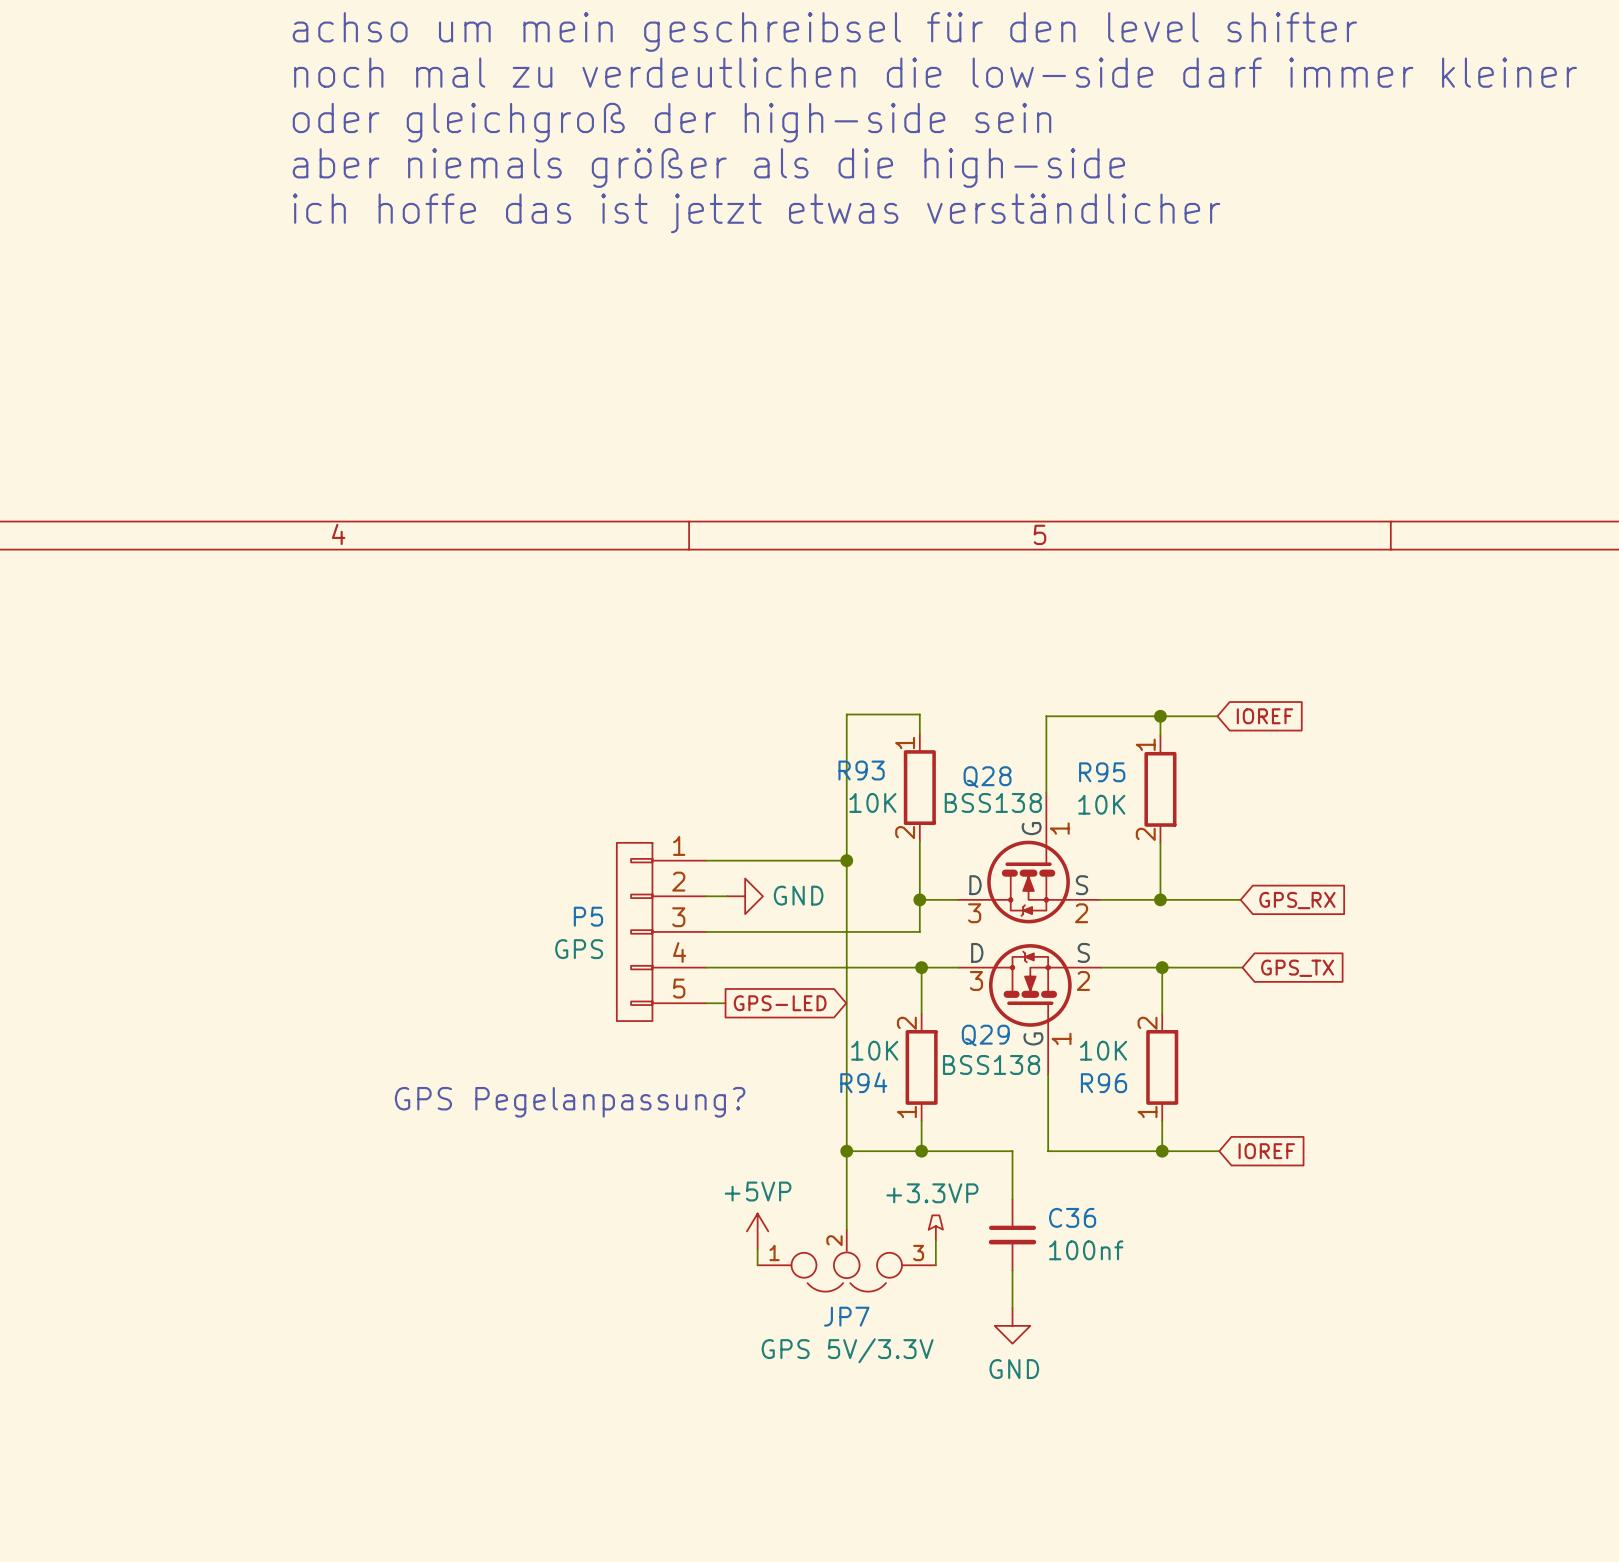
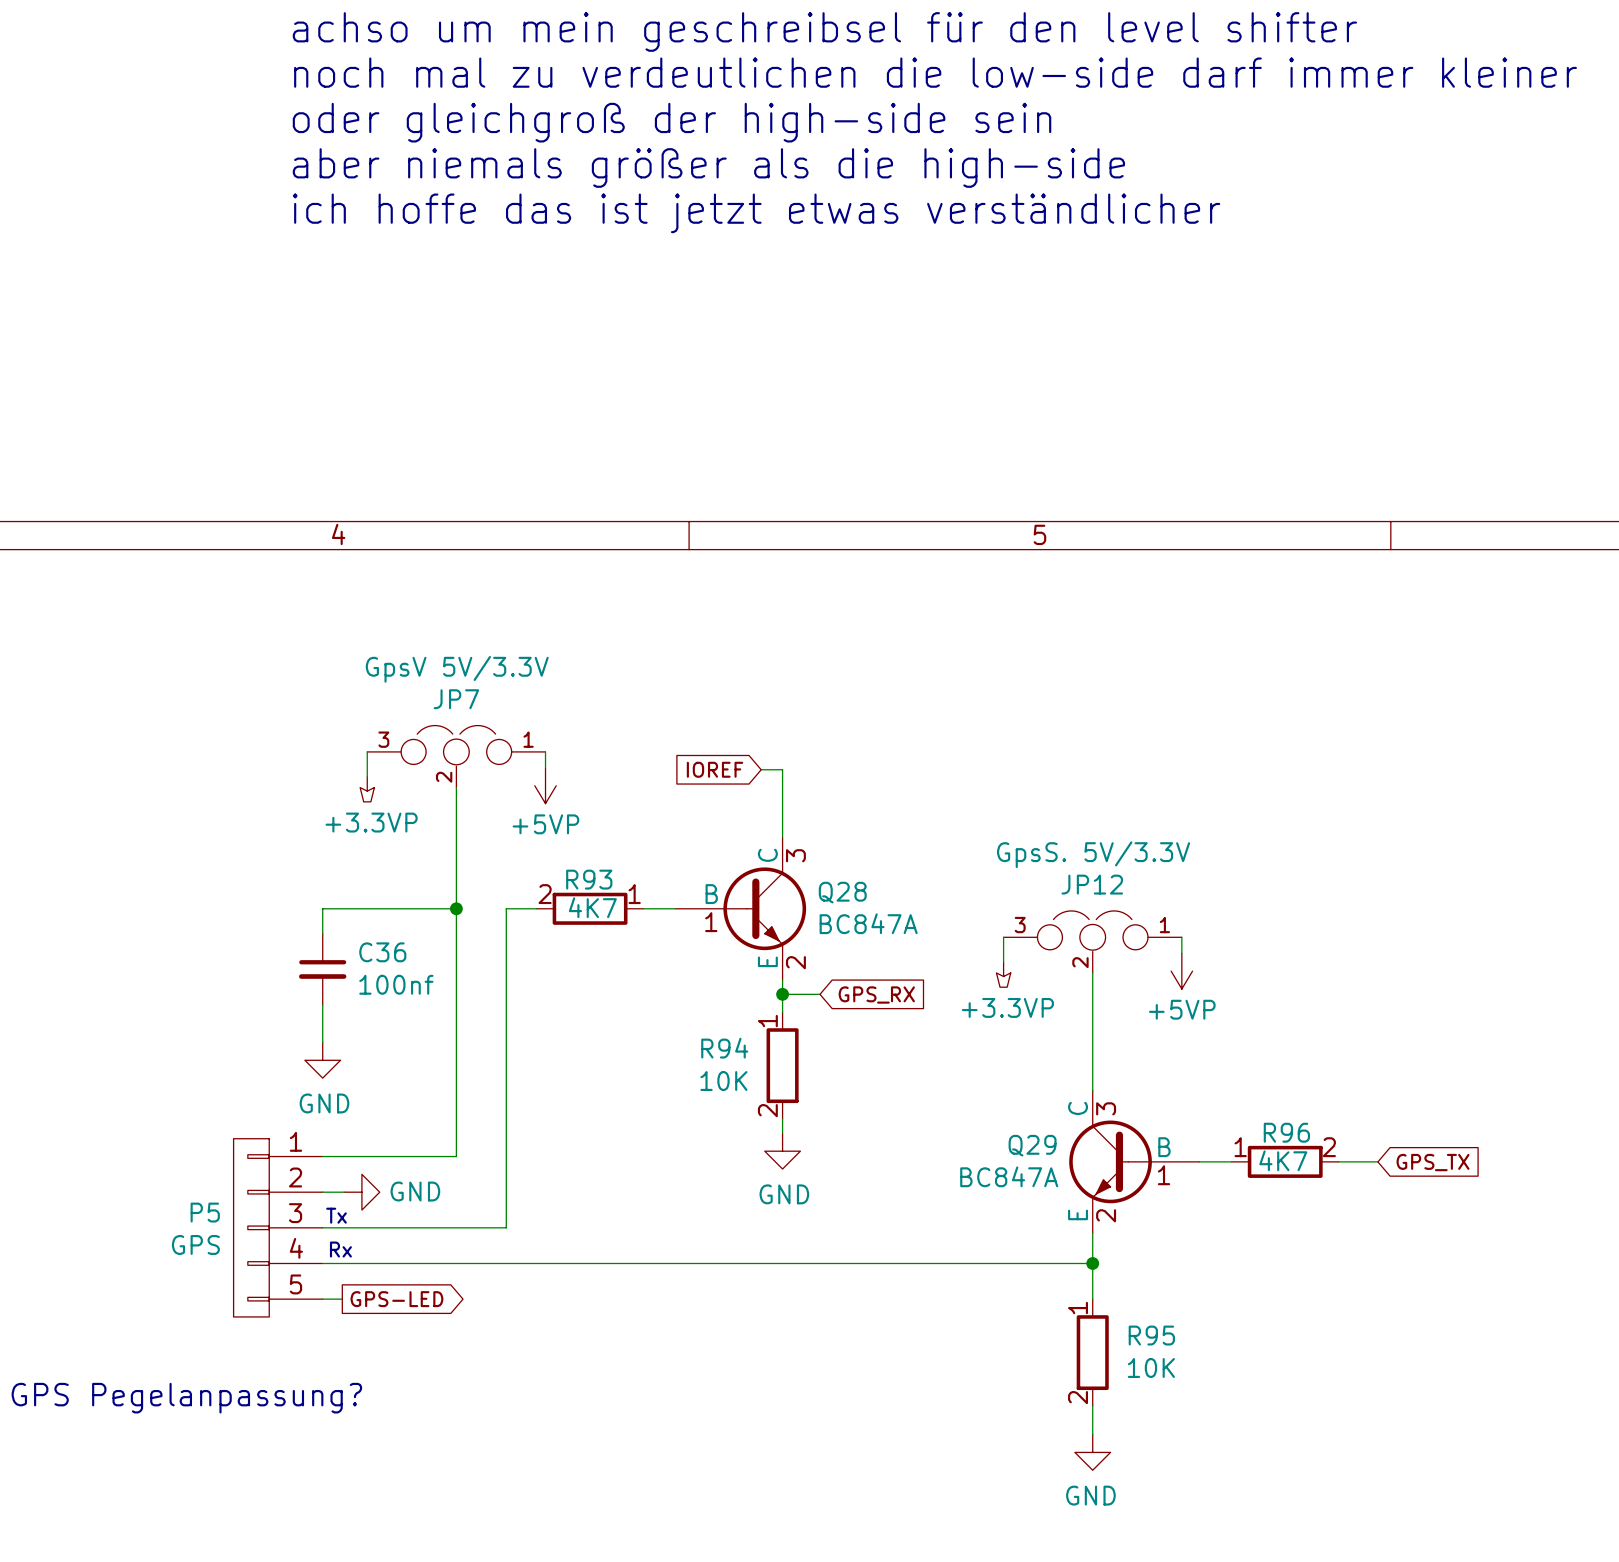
wire: (1160, 716) (1160, 735) -> none
junction: (1160, 716) -> none
wire: (1217, 716) (1046, 716) (1046, 792) -> none
global label: IOREF (1264, 716) -> none
wire: (919, 734) (919, 714) (846, 714) (846, 1229) -> none
wire: none -> (367, 751) (367, 776)
wire: none -> (545, 751) (545, 767)
global label: none -> IOREF (715, 769)
wire: none -> (761, 769) (782, 769) (782, 837)
R93 name position: R93 (861, 770) -> R93 (589, 879)
R95 name position: R95 (1102, 772) -> R95 (1151, 1335)
Q28 name position: Q28 (987, 777) -> Q28 (842, 892)
power symbol: none -> +5VP (545, 785)
wire: none -> (456, 787) (456, 1156) (322, 1156)
R93 rotation: 0° (919, 787) -> 90° clockwise (590, 908)
R93 position: (919, 787) -> (590, 908)
power symbol: none -> +3.3VP (367, 789)
R95 position: (1160, 789) -> (1092, 1352)
Q28 symbol: [957, 792, 1100, 924] -> [675, 837, 807, 981]
R93 value: 10K (872, 802) -> 4K7 (592, 907)
Q28 value: BSS138 (993, 802) -> BC847A (868, 923)
R95 value position: 10K (1101, 804) -> 10K (1151, 1367)
wire: (919, 841) (919, 931) (705, 931) -> none
wire: (1160, 842) (1160, 899) -> none
wire: (705, 860) (846, 860) -> none
junction: (846, 860) -> none
wire: (705, 896) (727, 896) -> none
power symbol: GND (745, 896) -> none
wire: (919, 899) (957, 899) -> (782, 994) (820, 994)
junction: (919, 899) -> none
wire: (1099, 899) (1240, 899) -> none
junction: (1160, 899) -> none
global label: GPS_RX (1297, 900) -> none
wire: none -> (456, 908) (322, 908) (322, 933)
junction: none -> (456, 908)
wire: none -> (536, 908) (506, 908) (506, 1227) (322, 1227)
wire: none -> (643, 908) (675, 908)
P5 position: (661, 931) -> (278, 1227)
wire: none -> (1181, 937) (1181, 953)
JP12: none -> GpsS. 5V/3.3V (1092, 941)
Q29 symbol: [959, 944, 1102, 1075] -> [1069, 1090, 1200, 1234]
wire: (705, 967) (959, 967) -> none
wire: (921, 967) (921, 1013) -> none
junction: (921, 967) -> none
wire: (1101, 967) (1242, 967) -> none
wire: (1162, 967) (1162, 1013) -> none
junction: (1162, 967) -> none
global label position: GPS_TX (1297, 968) -> GPS_TX (1433, 1162)
power symbol: none -> +5VP (1181, 971)
wire: none -> (1092, 972) (1092, 1090)
wire: none -> (782, 980) (782, 1012)
junction: none -> (782, 994)
global label: none -> GPS_RX (876, 995)
wire: (705, 1003) (725, 1003) -> none
global label: GPS-LED (780, 1003) -> none
wire: none -> (322, 1005) (322, 1042)
Q29 name position: Q29 (985, 1035) -> Q29 (1032, 1145)
R94 value position: 10K (874, 1050) -> 10K (723, 1081)
R96 value: 10K (1103, 1050) -> 4K7 (1283, 1160)
power symbol: none -> GND (322, 1060)
Q29 value: BSS138 (991, 1064) -> BC847A (1009, 1176)
R94 rotation: 0° (921, 1067) -> 180° (782, 1065)
R94 position: (921, 1067) -> (782, 1065)
R96 rotation: 0° (1162, 1067) -> 90° clockwise (1285, 1161)
R96 position: (1162, 1067) -> (1285, 1161)
wire: (1048, 1074) (1048, 1151) (1219, 1151) -> none
R94 name position: R94 (863, 1082) -> R94 (724, 1048)
R96 name position: R96 (1103, 1083) -> R96 (1286, 1132)
text: GPS Pegelanpassung? (570, 1102) -> none
wire: none -> (782, 1119) (782, 1133)
wire: (921, 1120) (921, 1151) -> none
wire: (1162, 1120) (1162, 1151) -> none
power symbol: none -> GND (782, 1151)
wire: (846, 1151) (1012, 1151) (1012, 1199) -> none
junction: (846, 1151) -> none
junction: (921, 1151) -> none
junction: (1162, 1151) -> none
global label: IOREF (1266, 1151) -> none
wire: none -> (1199, 1161) (1231, 1161)
wire: none -> (1338, 1161) (1377, 1161)
wire: none -> (322, 1192) (344, 1192)
power symbol: none -> GND (361, 1192)
text: none -> Tx (336, 1215)
power symbol rotation: 0° (935, 1227) -> 180° (1003, 974)
power symbol position: +3.3VP (935, 1227) -> +3.3VP (1003, 974)
power symbol: +5VP (757, 1231) -> none
wire: none -> (1092, 1233) (1092, 1299)
C36 position: (1012, 1234) -> (322, 969)
wire: (935, 1240) (935, 1265) -> (1003, 937) (1003, 962)
text: none -> Rx (340, 1249)
wire: (757, 1249) (757, 1265) -> none
JP7 position: (846, 1260) -> (456, 756)
wire: none -> (322, 1263) (1092, 1263)
junction: none -> (1092, 1263)
wire: (1012, 1270) (1012, 1308) -> none
JP7 rotation: 0° (846, 1272) -> 180° (456, 745)
wire: none -> (322, 1299) (342, 1299)
global label: none -> GPS-LED (396, 1299)
power symbol: GND (1012, 1325) -> none
JP7 value: GPS 5V/3.3V (847, 1350) -> GpsV 5V/3.3V (457, 669)
text: none -> GPS Pegelanpassung? (186, 1398)
wire: none -> (1092, 1406) (1092, 1434)
power symbol: none -> GND (1092, 1452)

